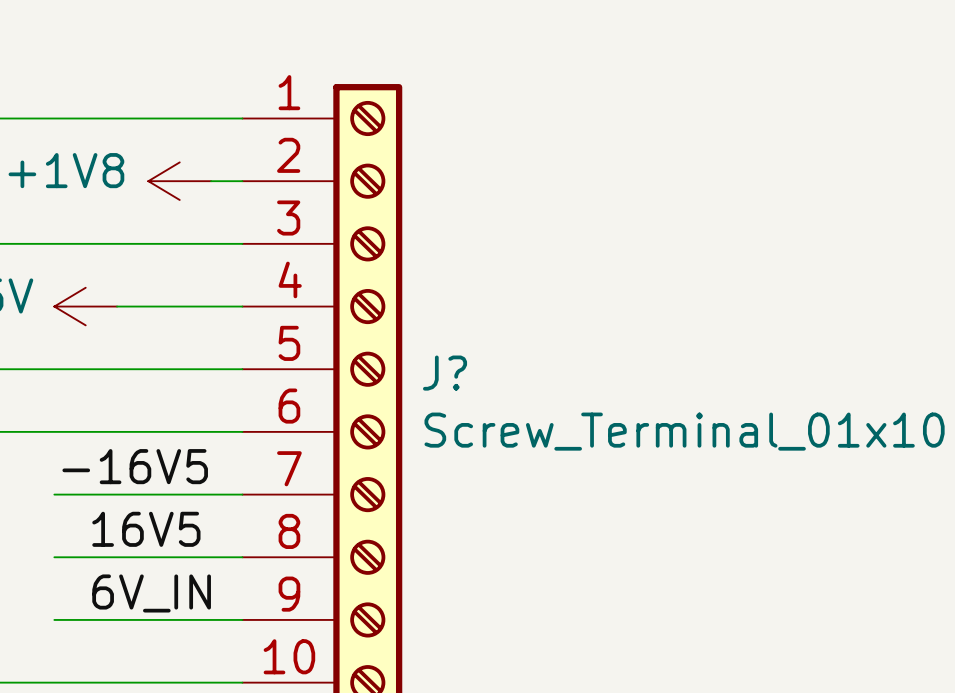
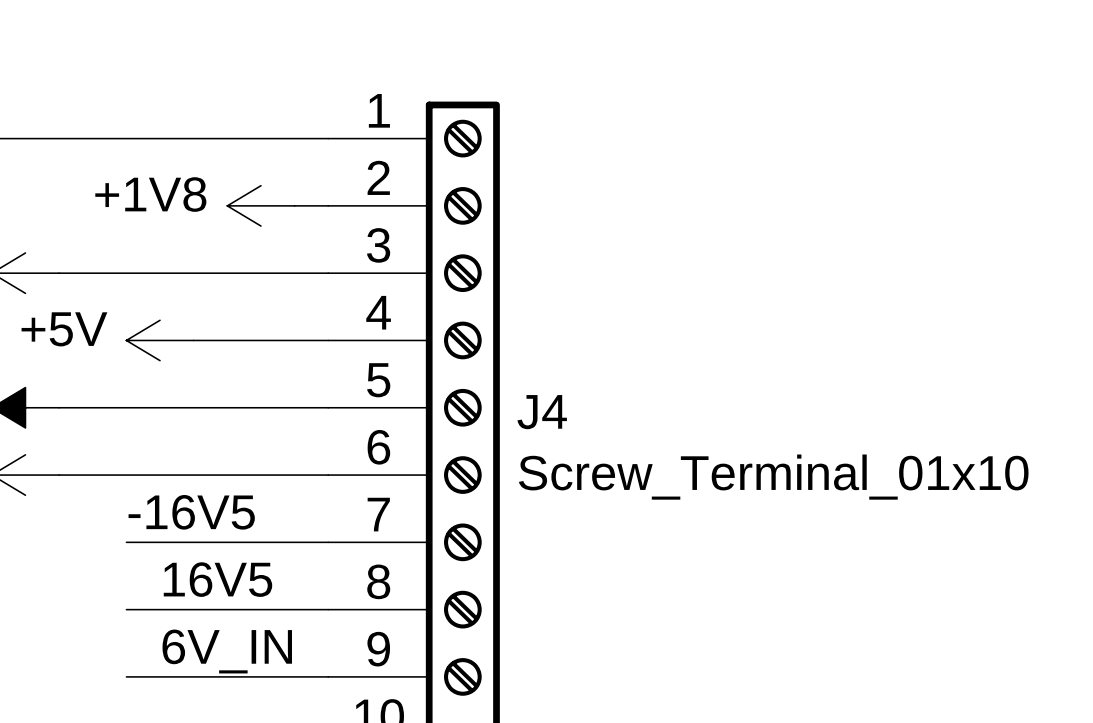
J? name: J? (445, 373) -> J4 (542, 412)

